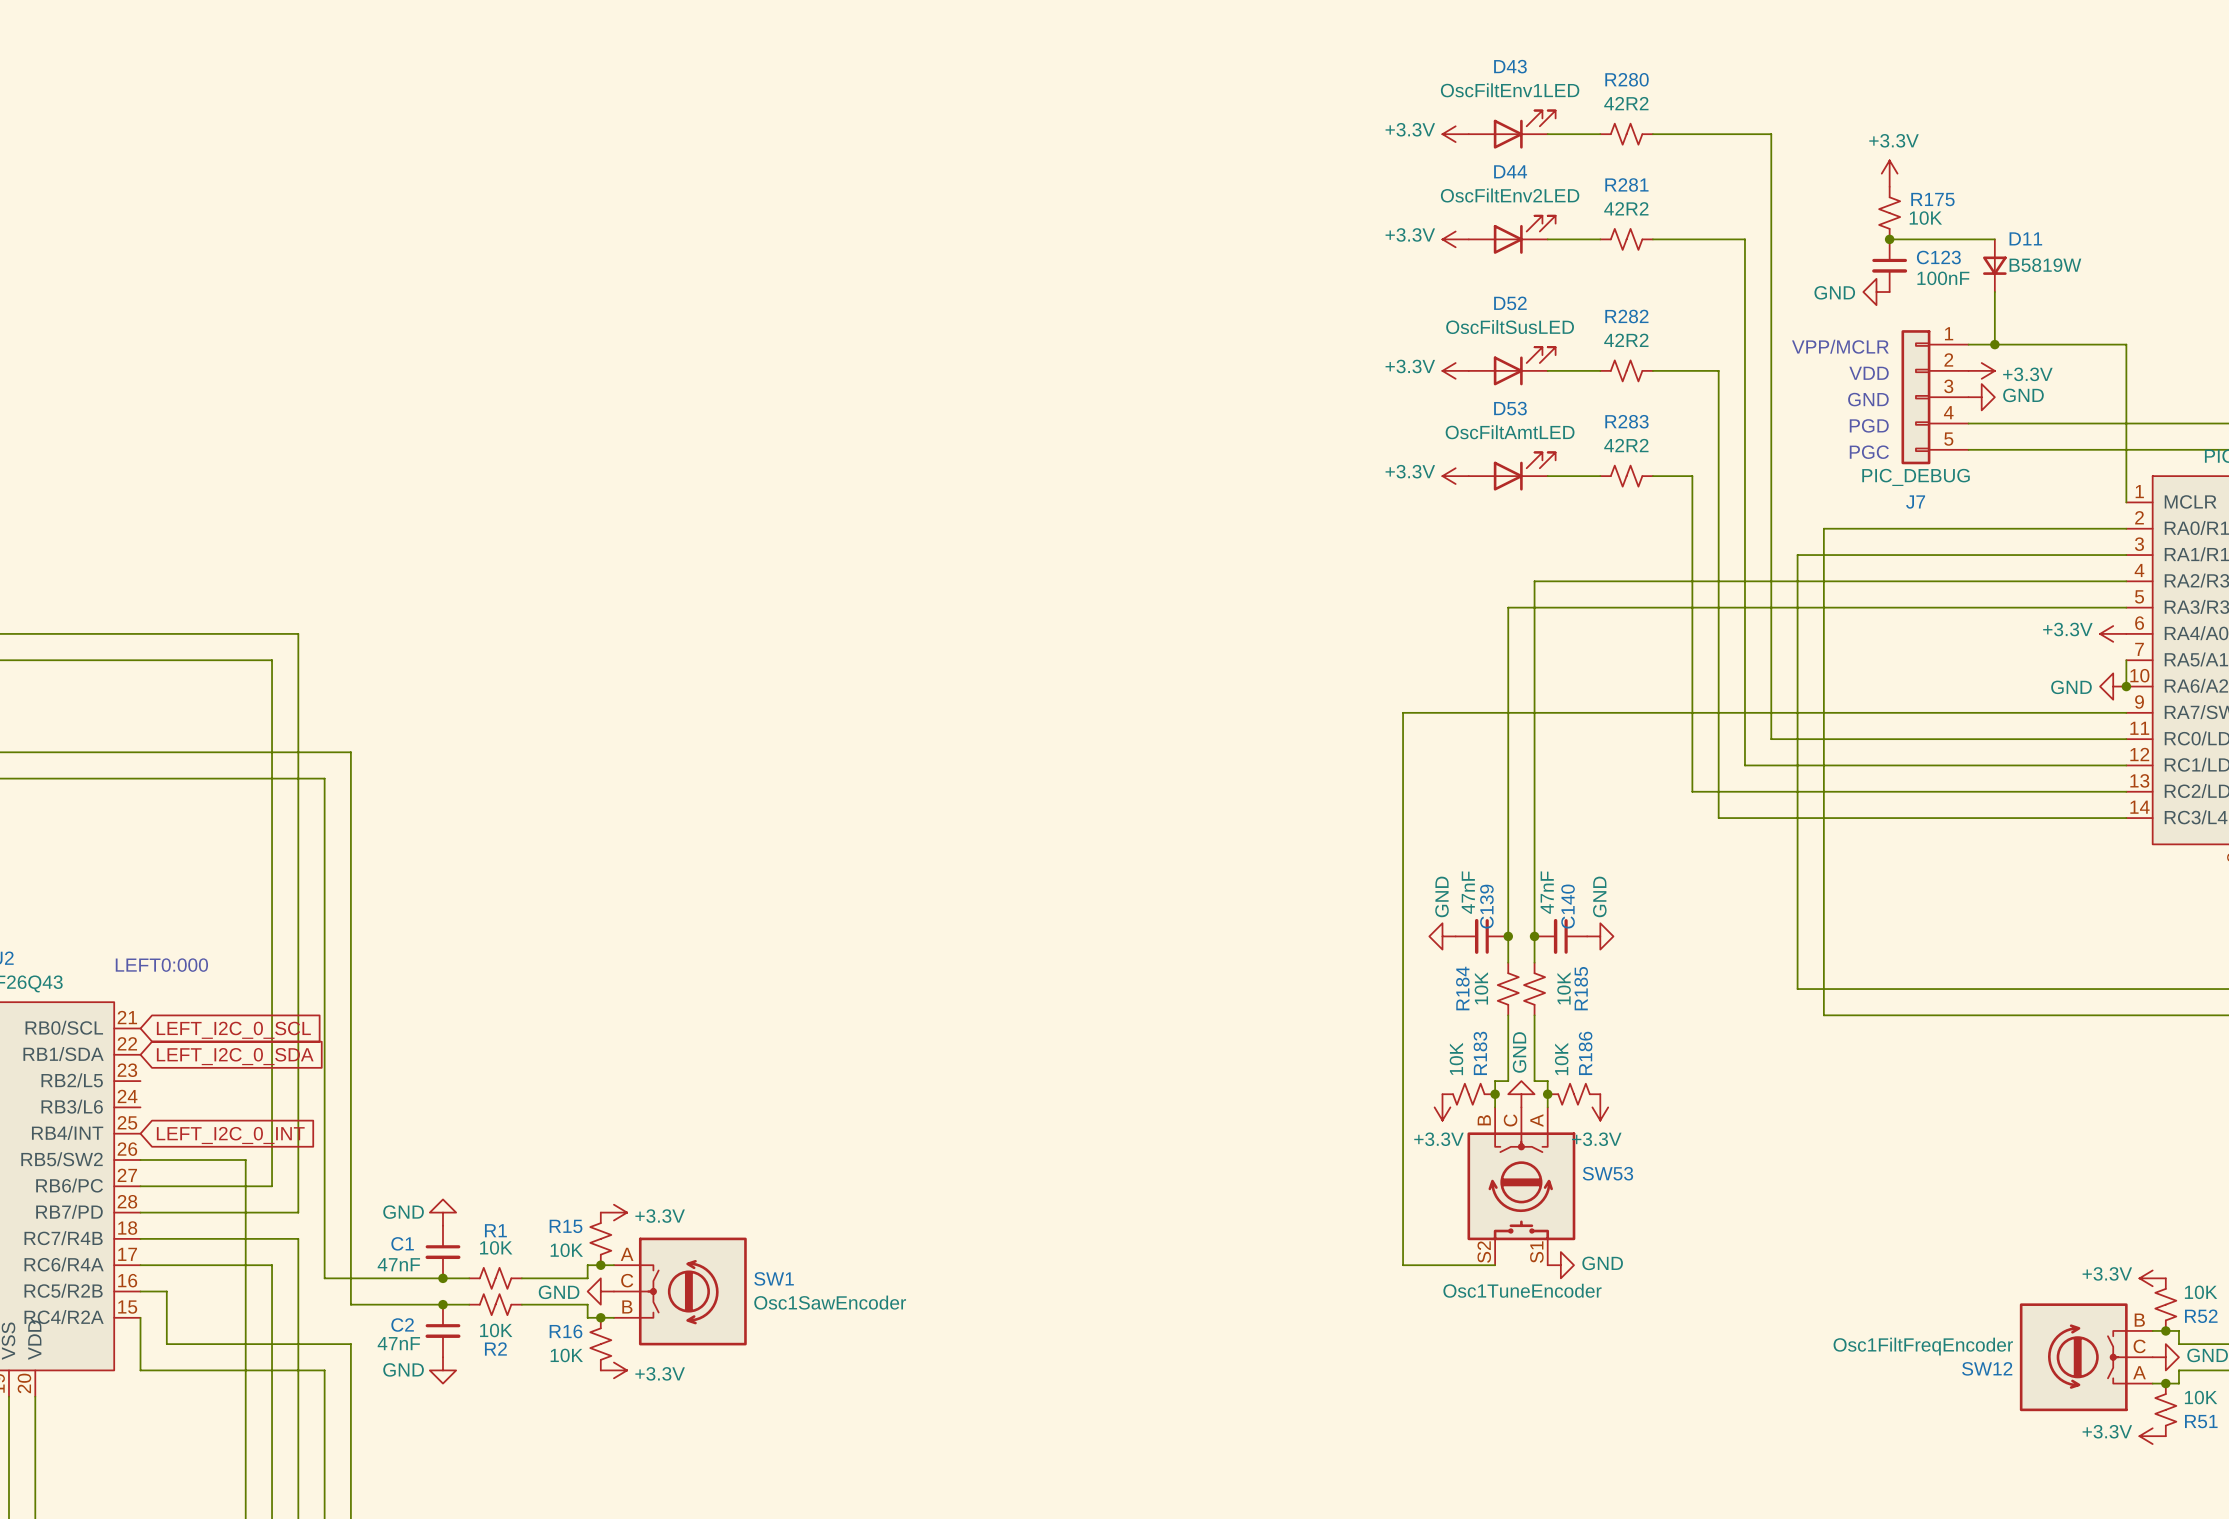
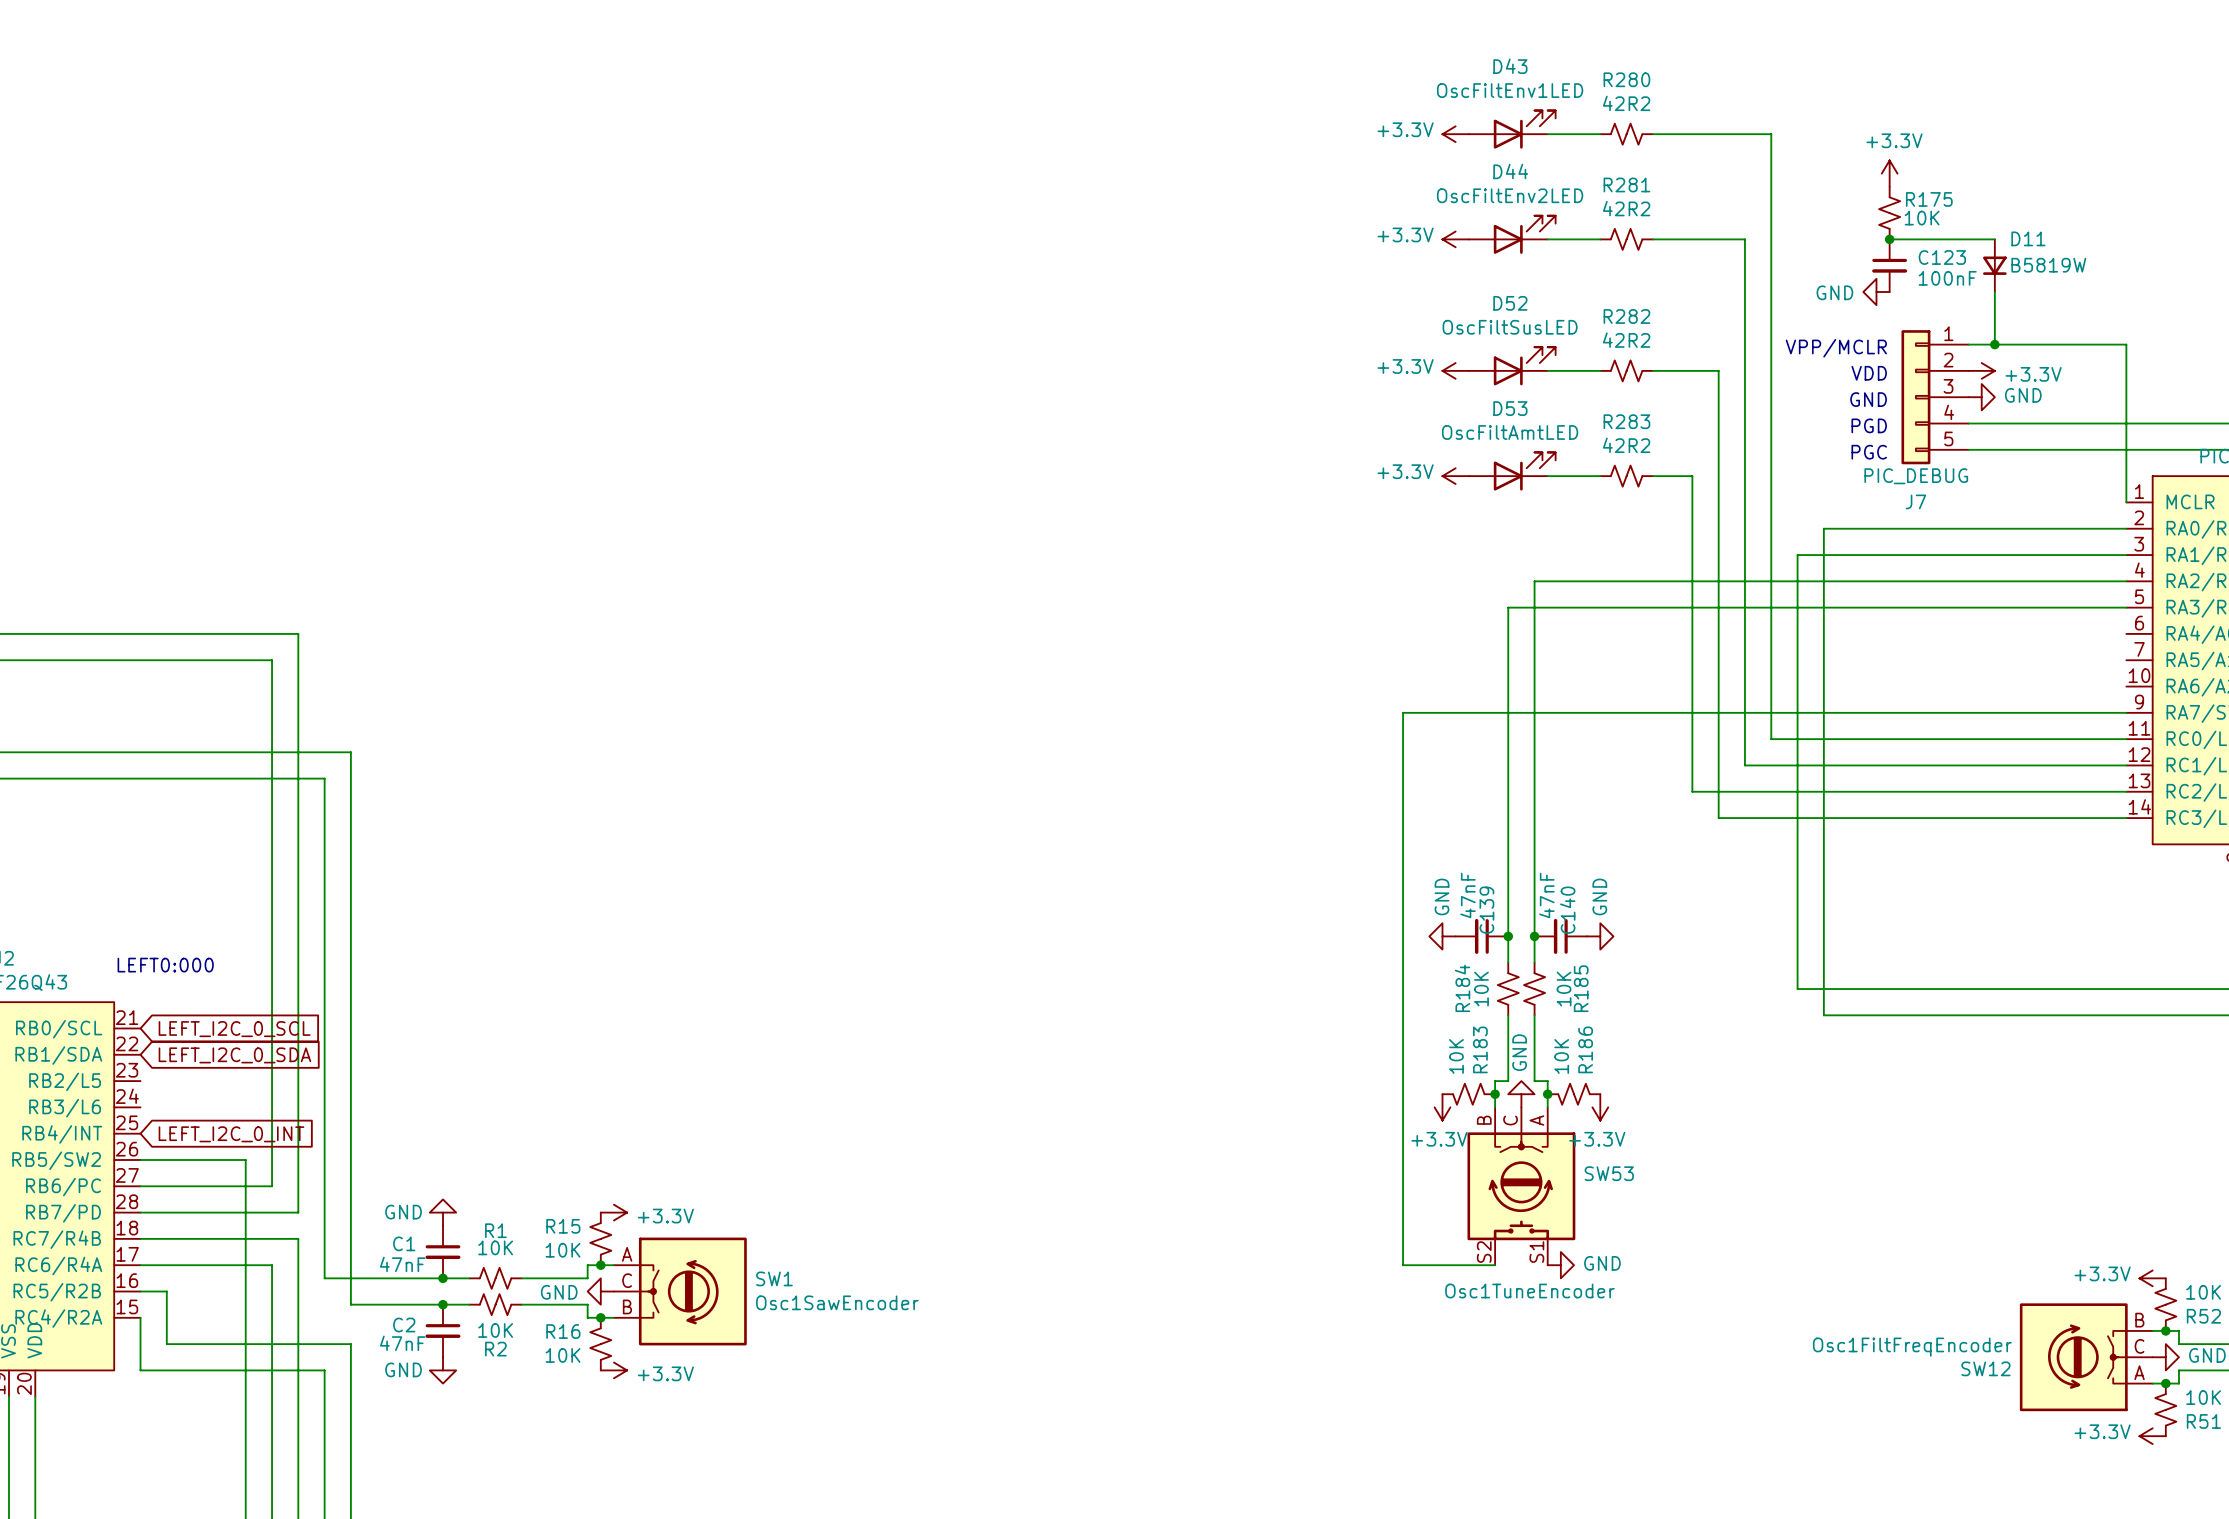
power symbol: +3.3V (2113, 633) -> none
wire: (2126, 660) (2126, 686) -> none
power symbol: GND (2113, 686) -> none
junction: (2126, 686) -> none

